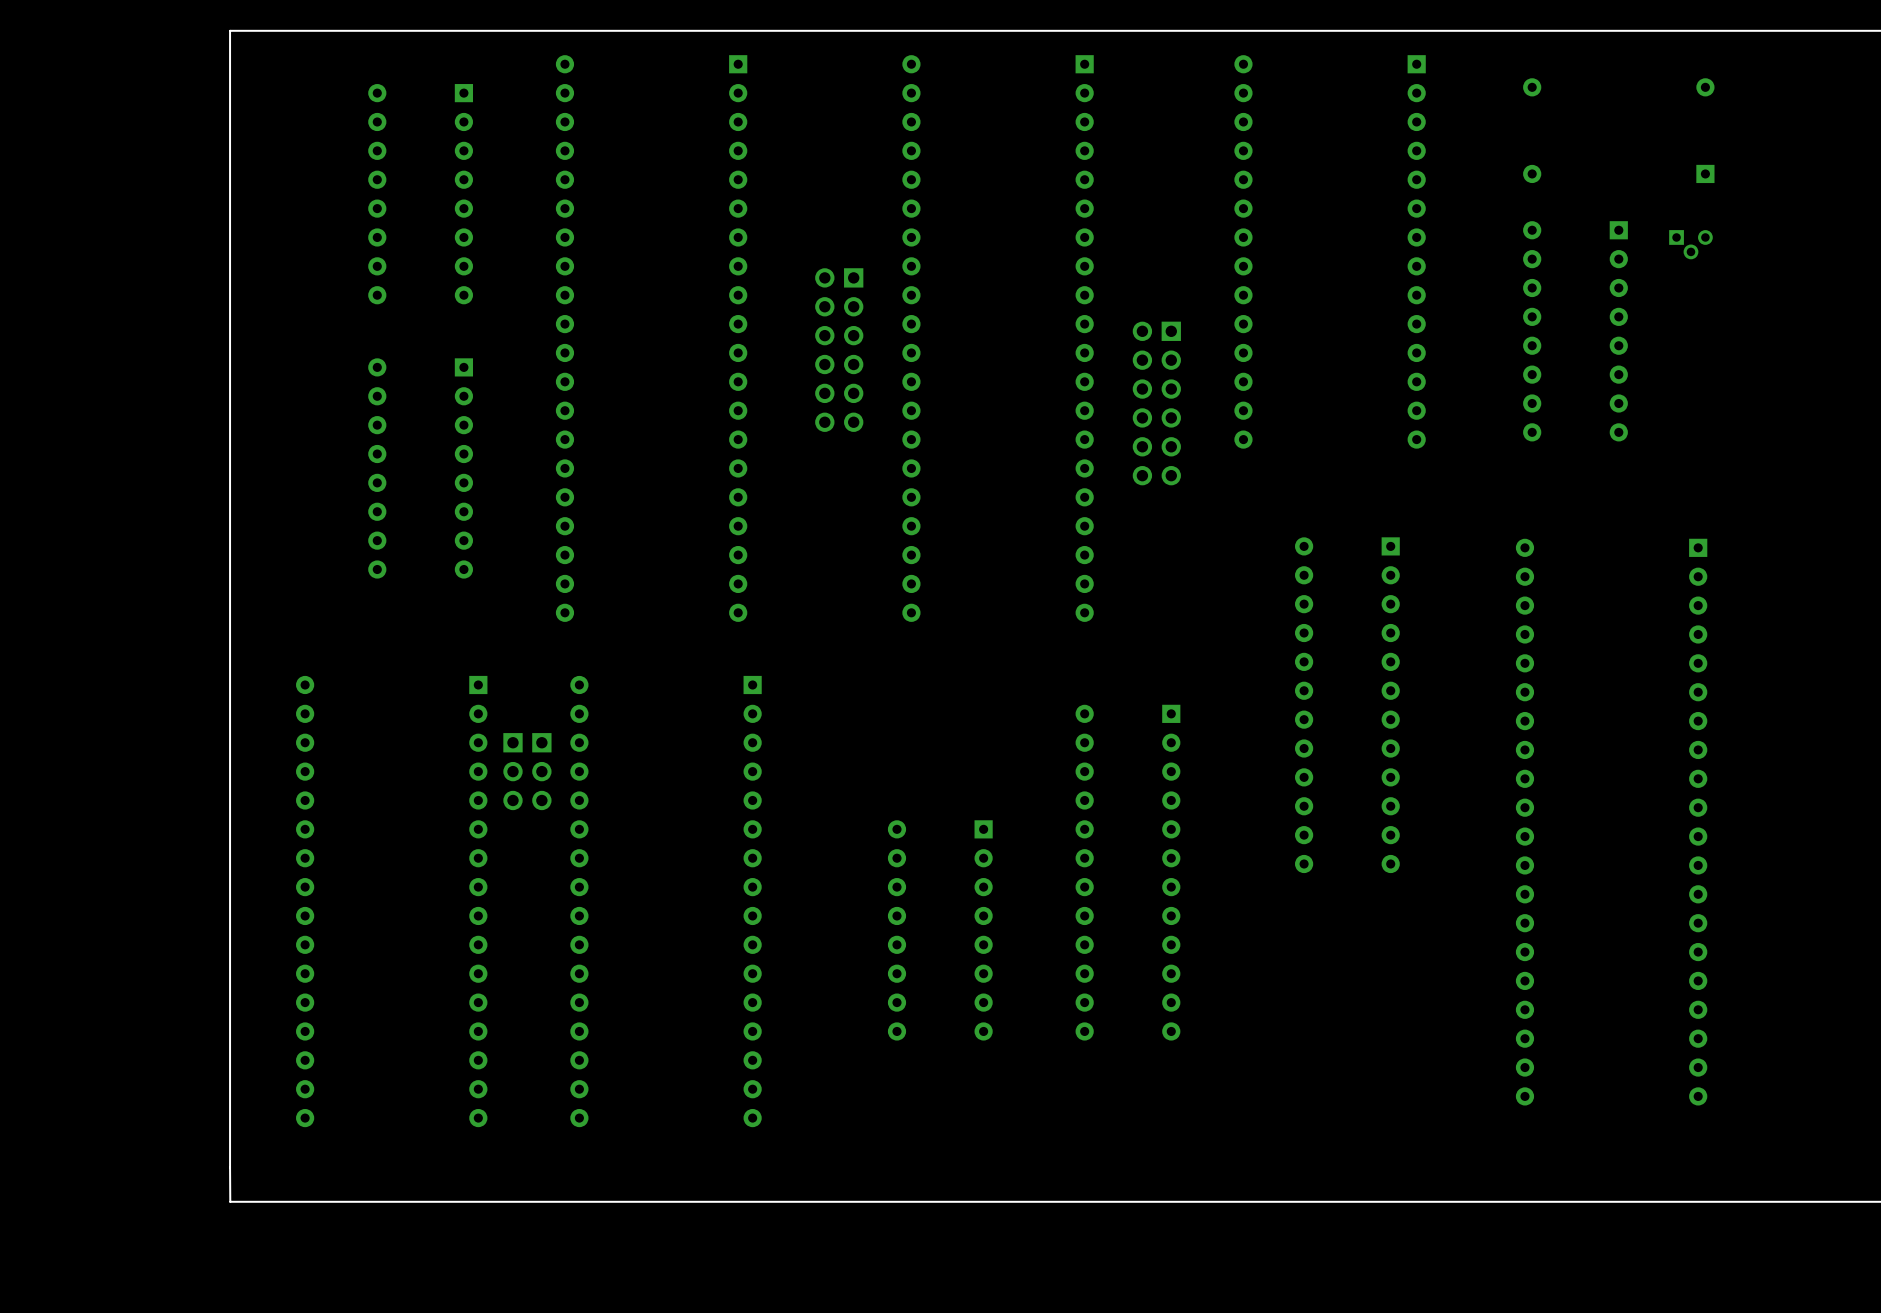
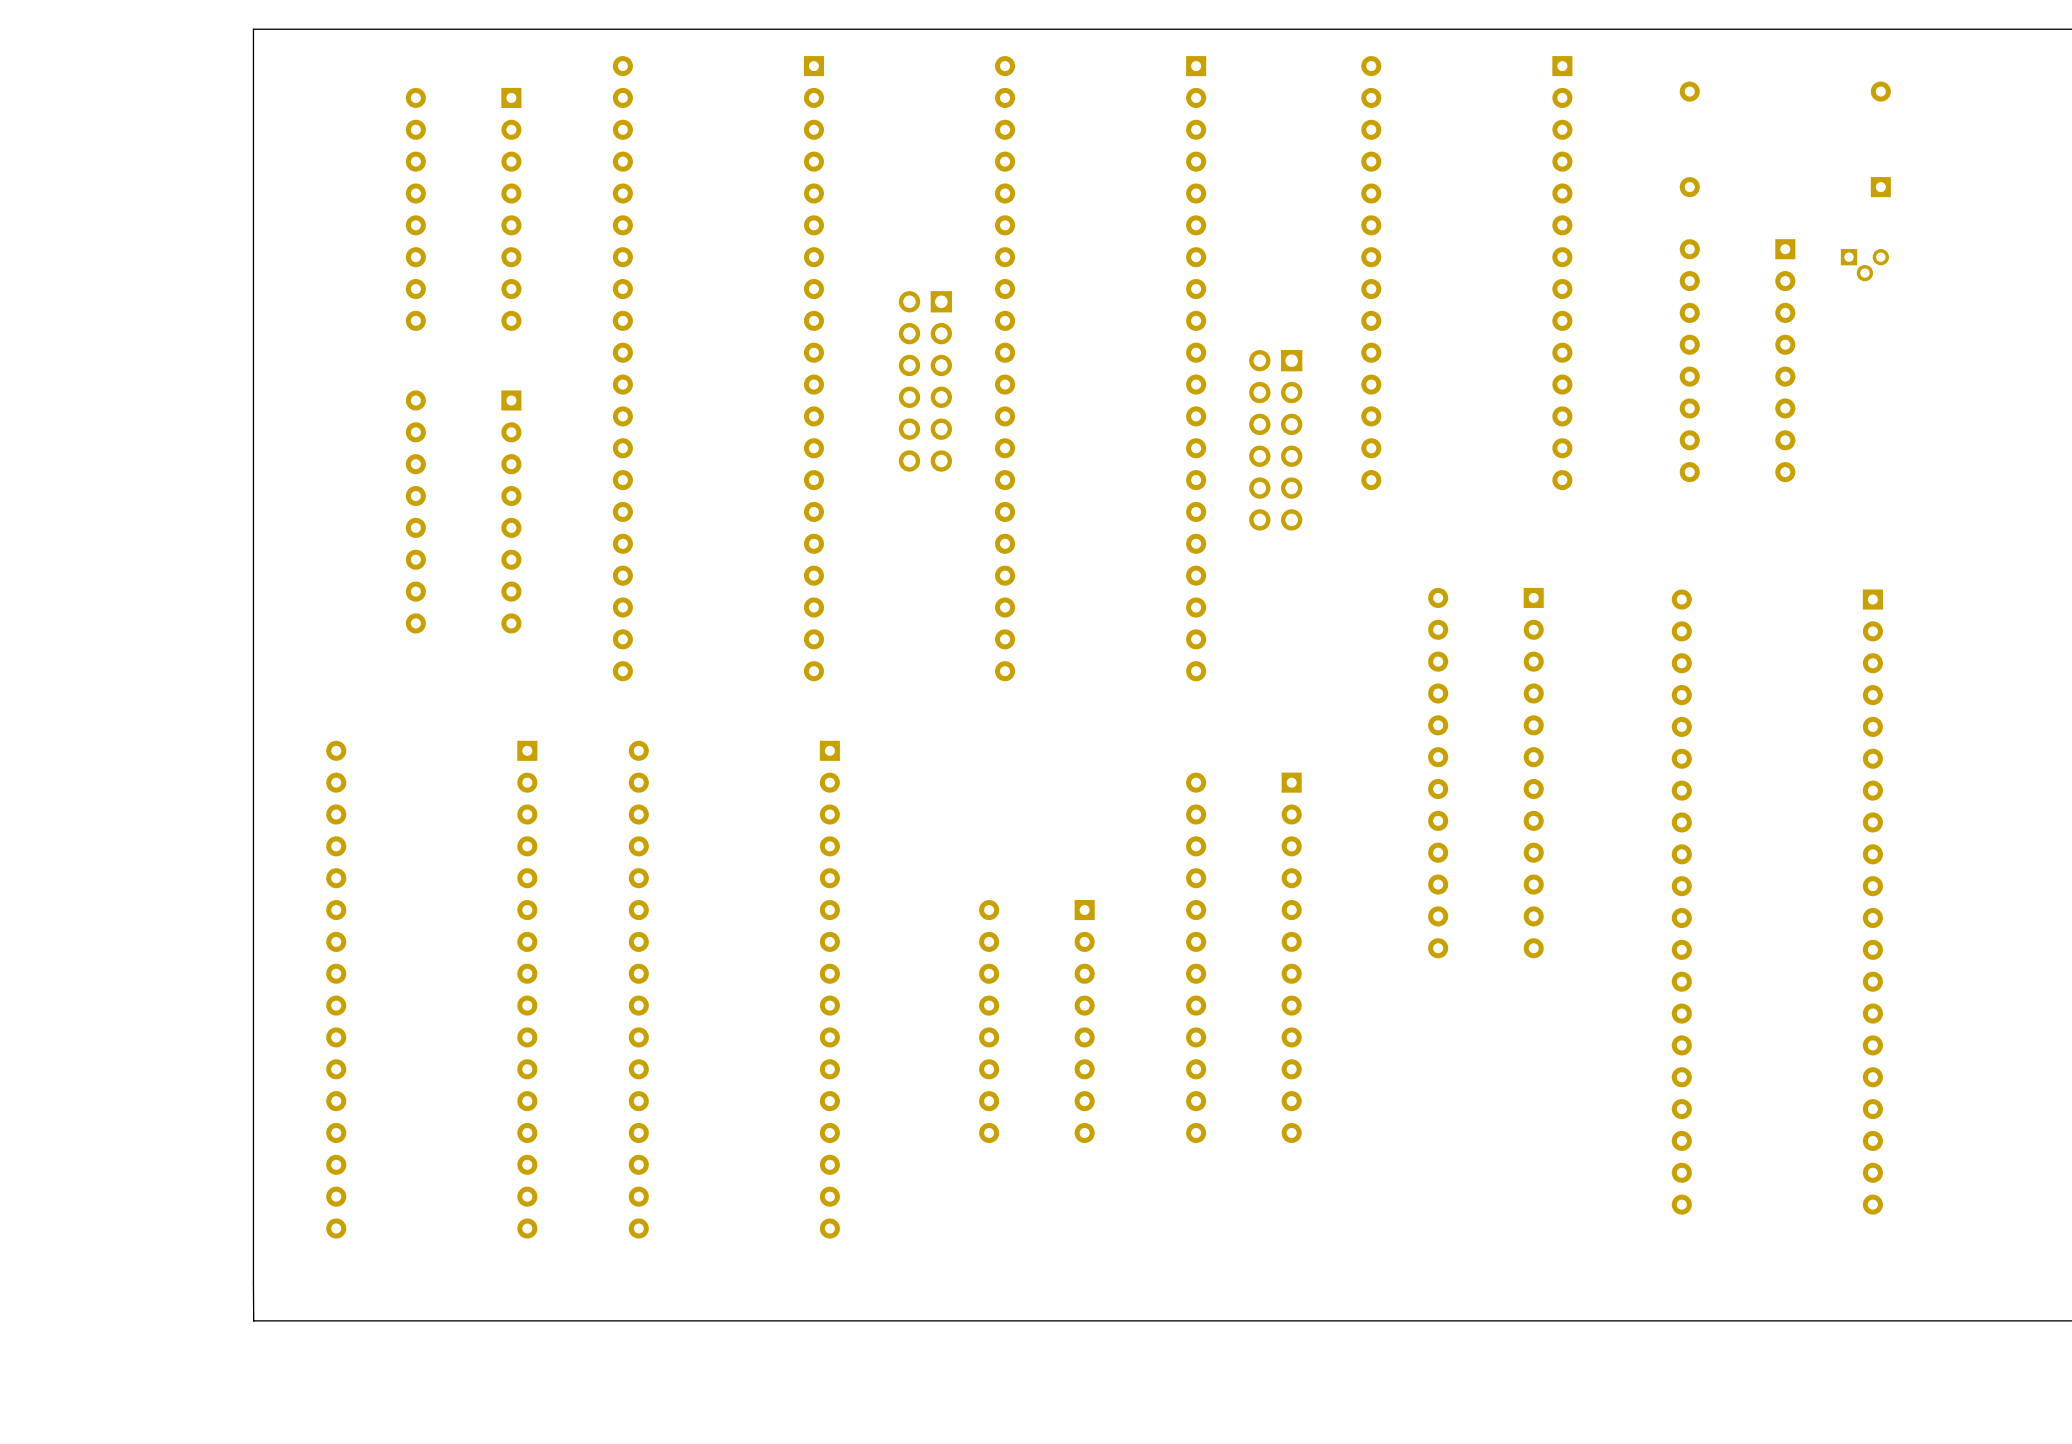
part: (512, 771) -> none
part: (541, 771) -> none

